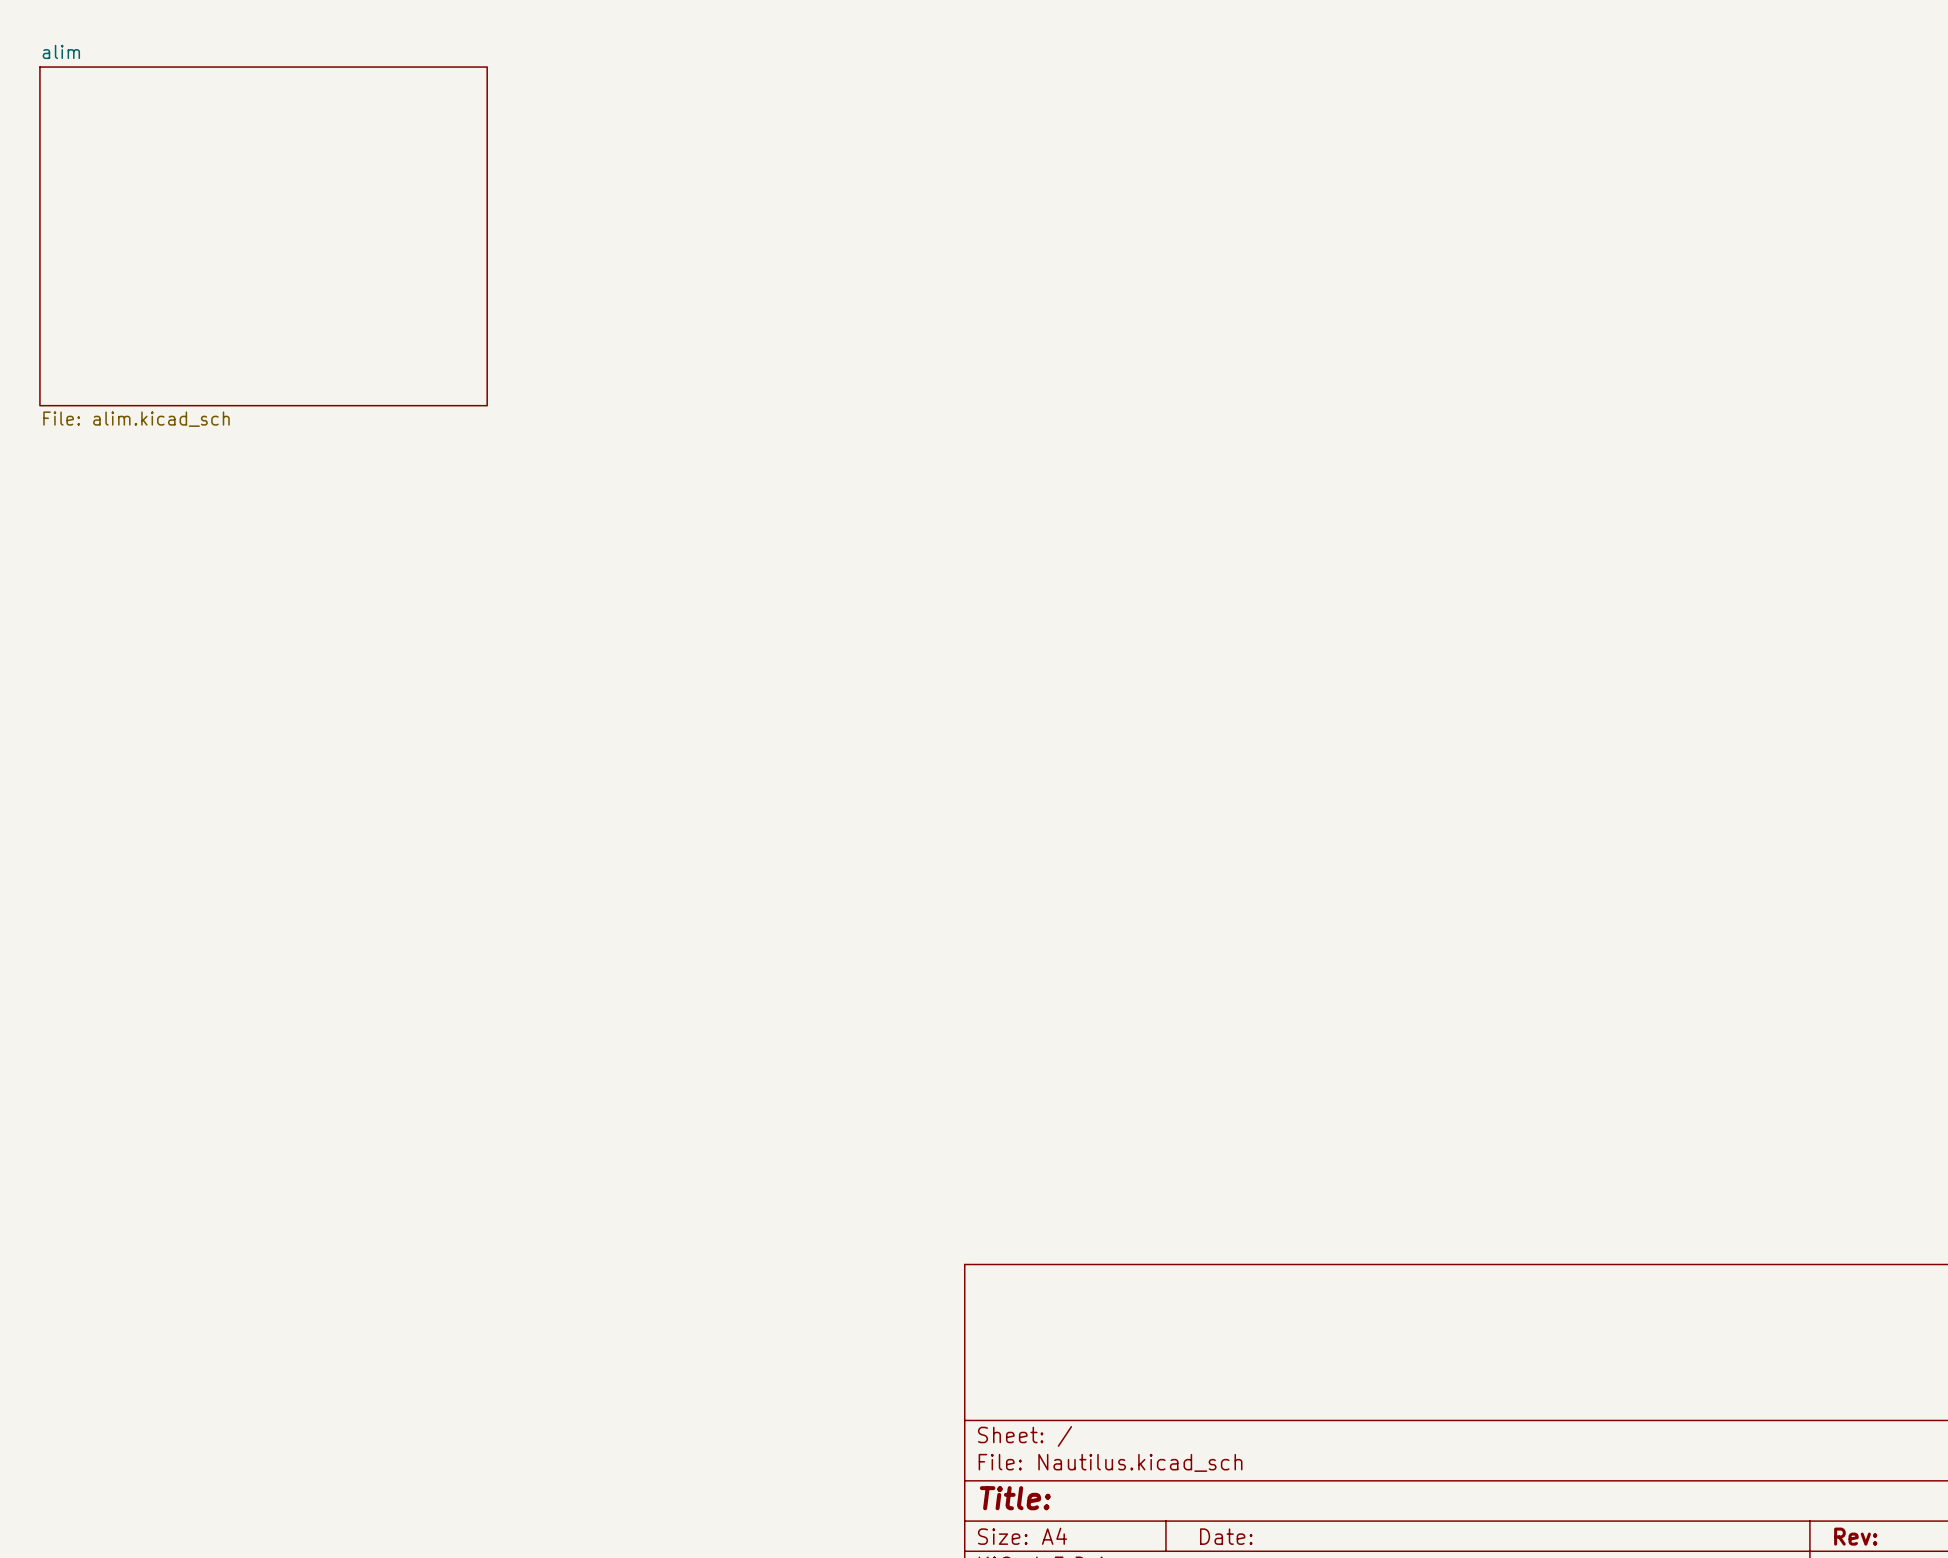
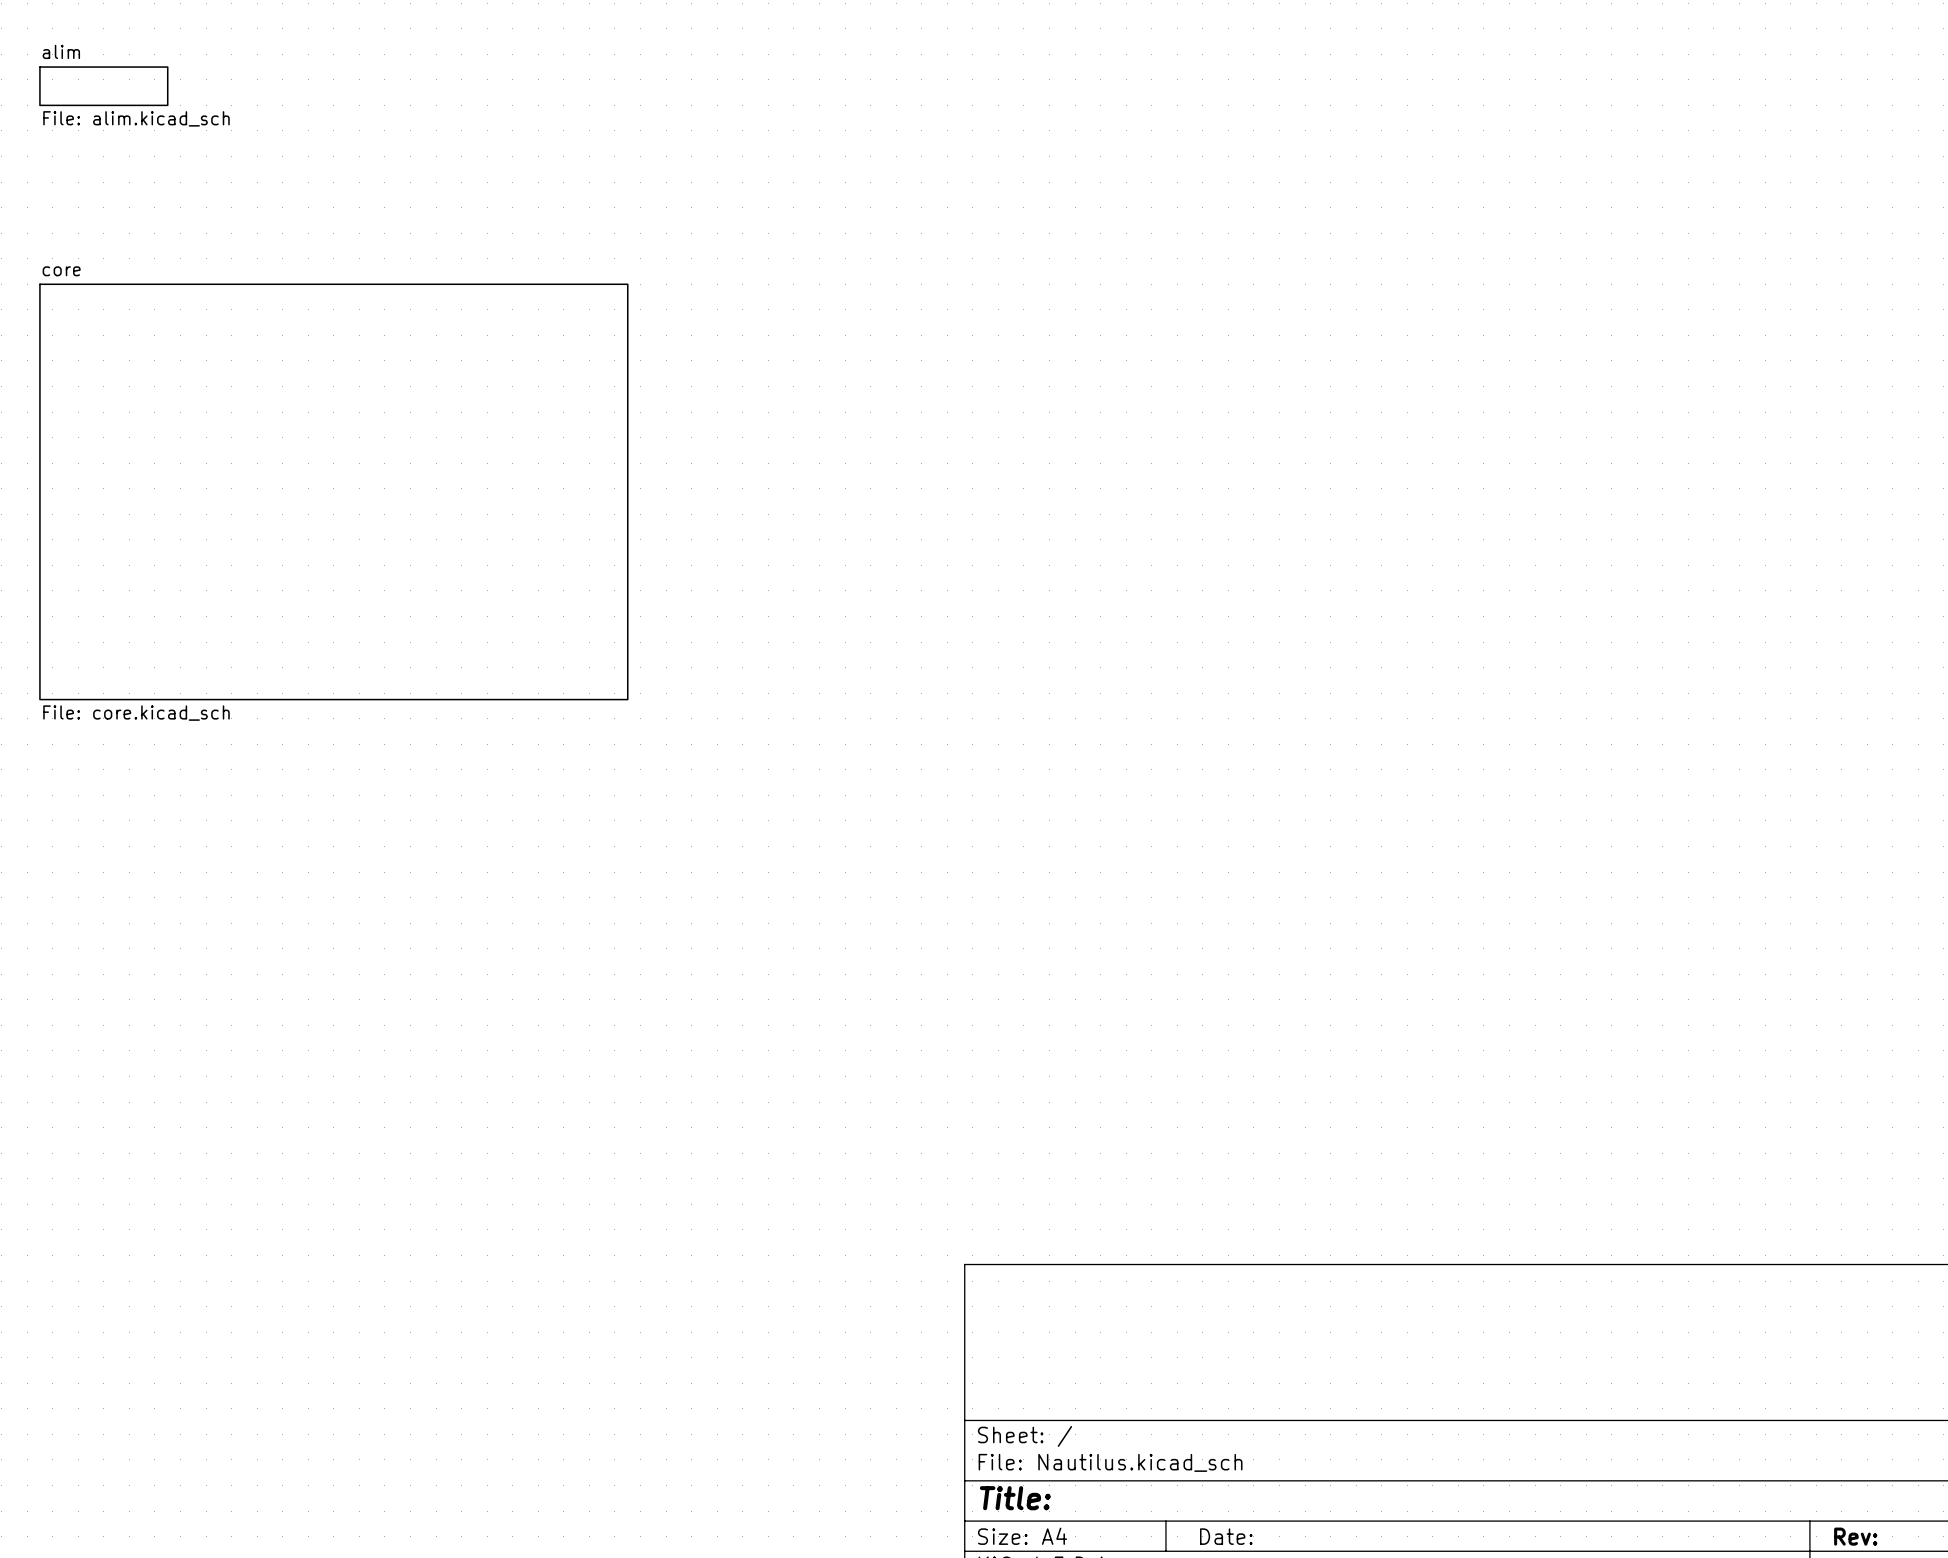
sheet alim: none -> File: alim.kicad_sch (103, 86)
sheet alim: File: alim.kicad_sch (263, 236) -> none
sheet core: none -> File: core.kicad_sch (333, 491)

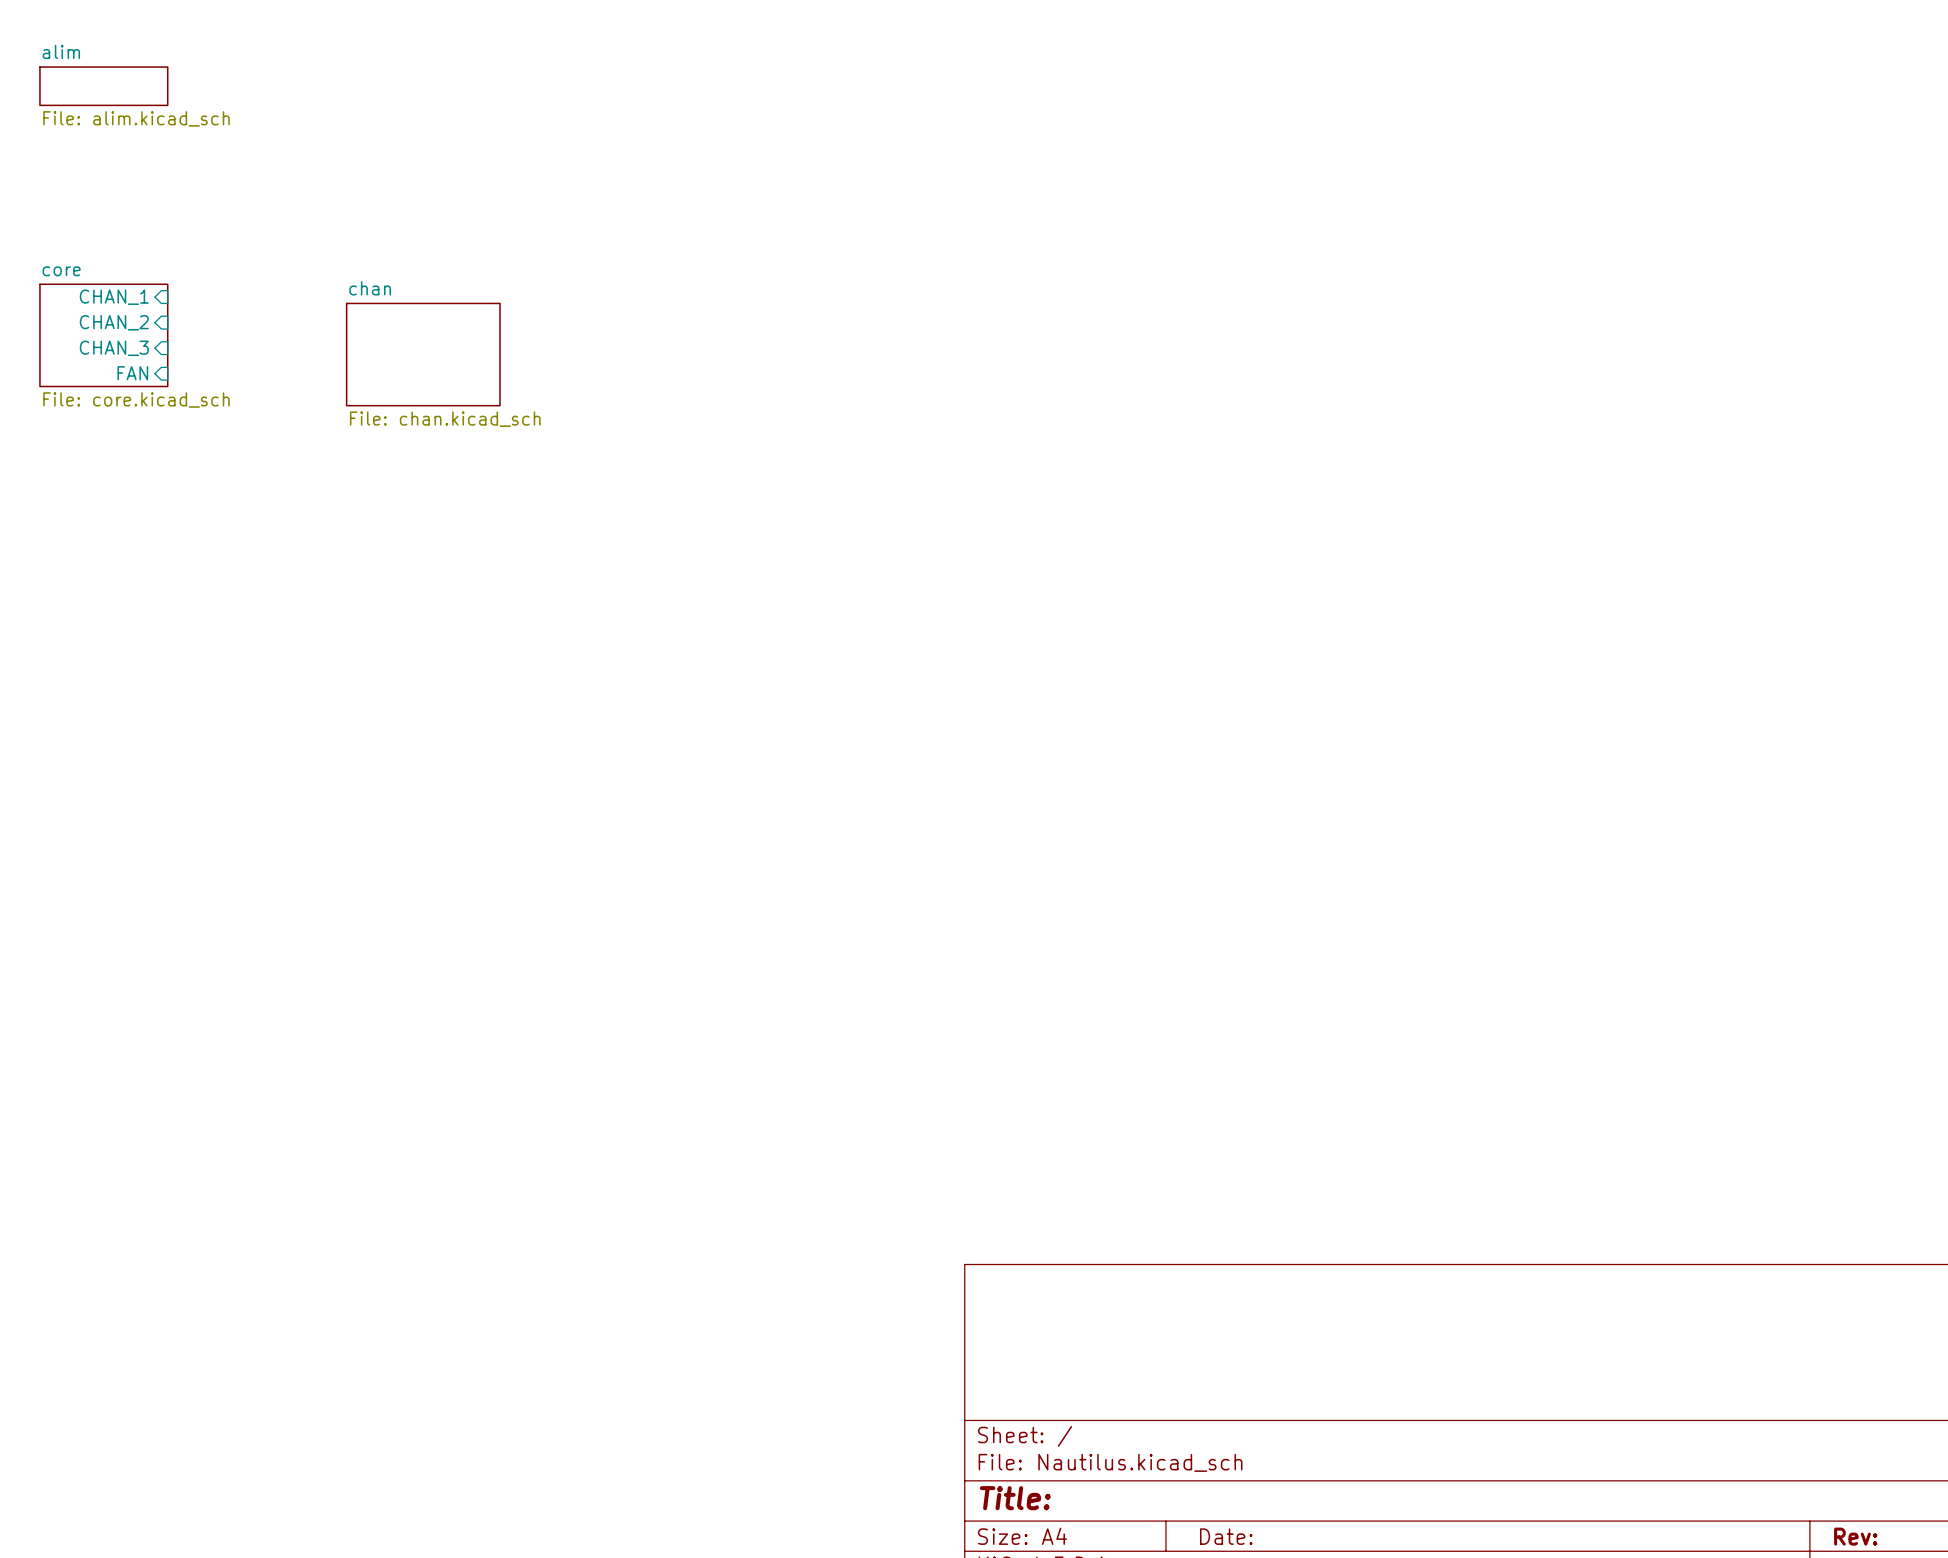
sheet pin: none -> CHAN_1 (114, 297)
sheet pin: none -> CHAN_2 (114, 322)
sheet core: none -> File: core.kicad_sch (103, 335)
sheet pin: none -> CHAN_3 (114, 348)
sheet chan: none -> File: chan.kicad_sch (423, 354)
sheet pin: none -> FAN (132, 373)
sheet core: File: core.kicad_sch (333, 491) -> none

